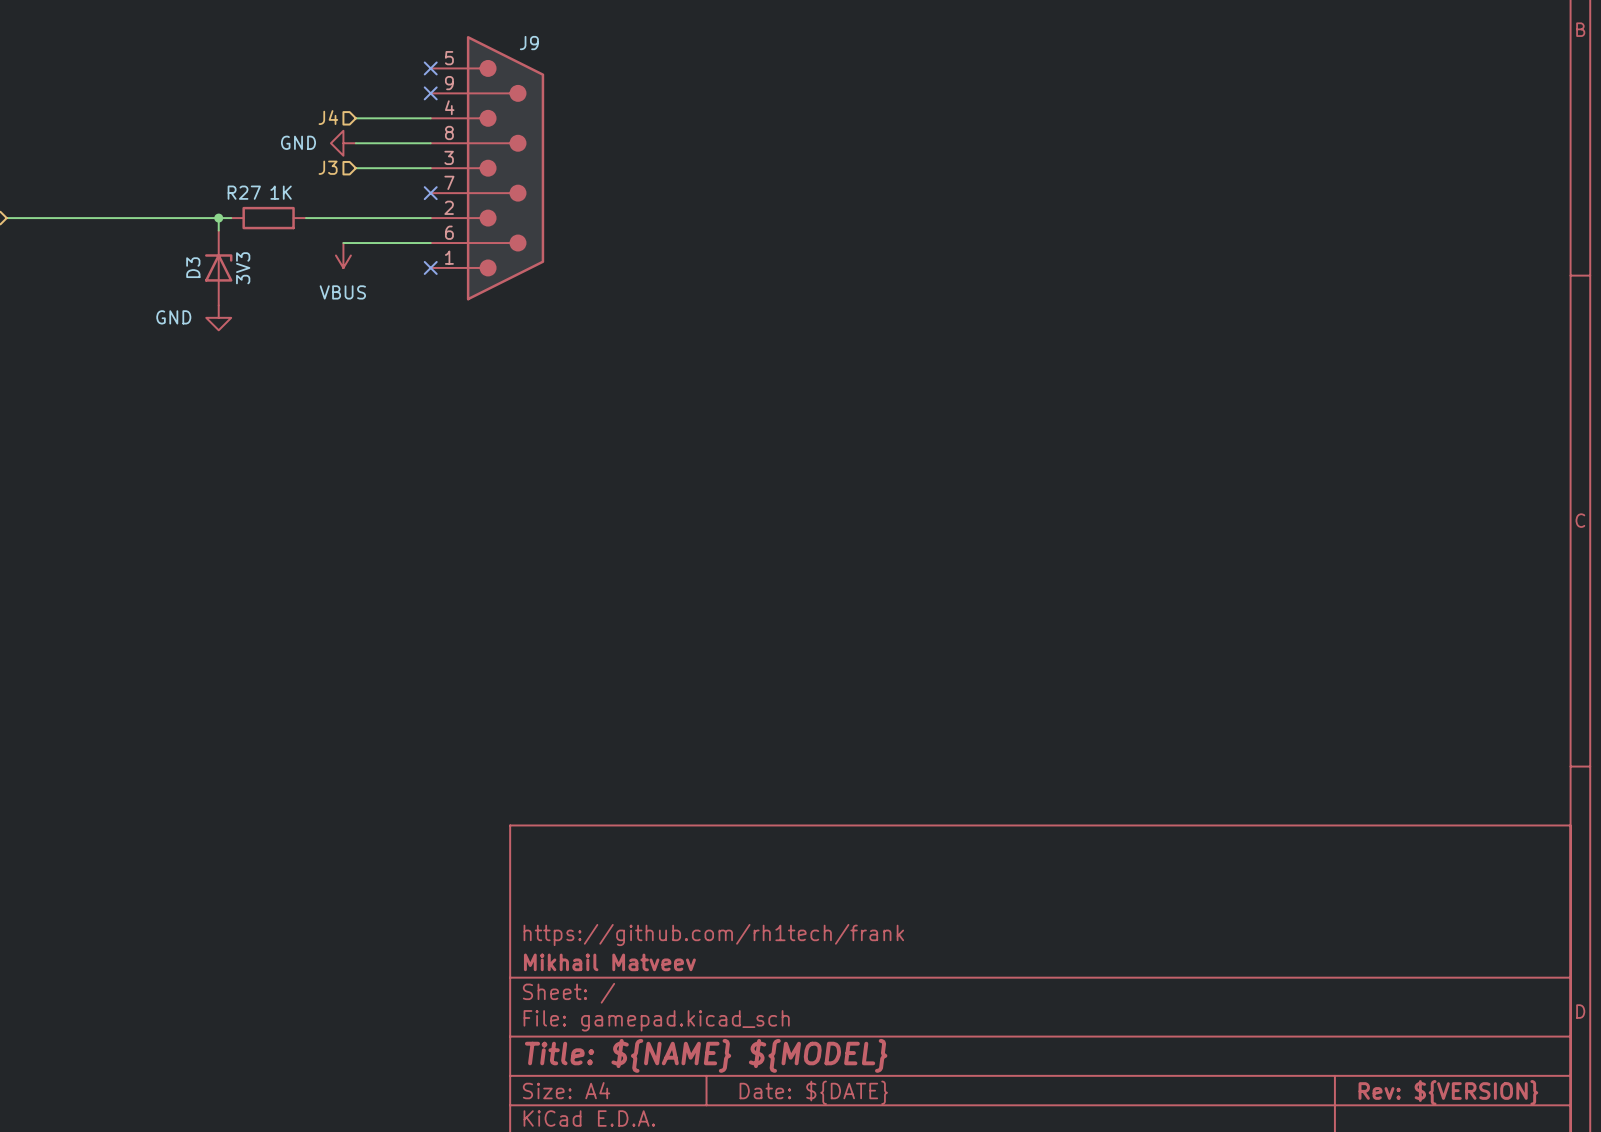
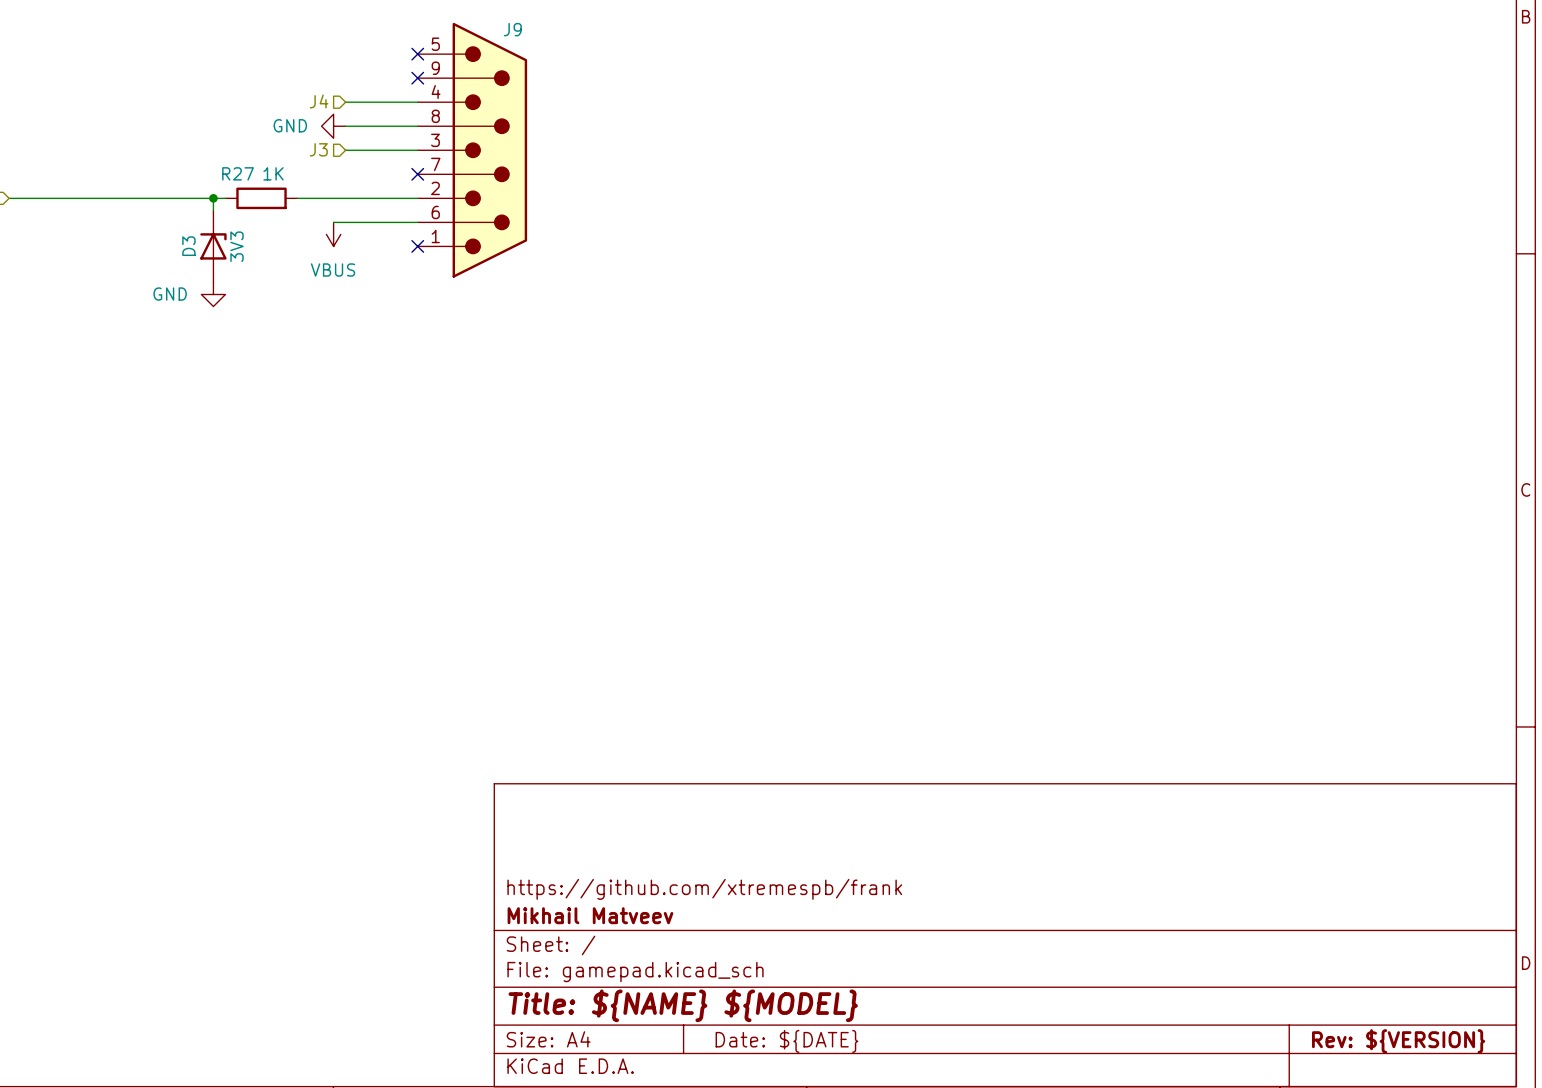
title block: https://github.com/rh1tech/frank (713, 935) -> https://github.com/xtremespb/frank (704, 889)

